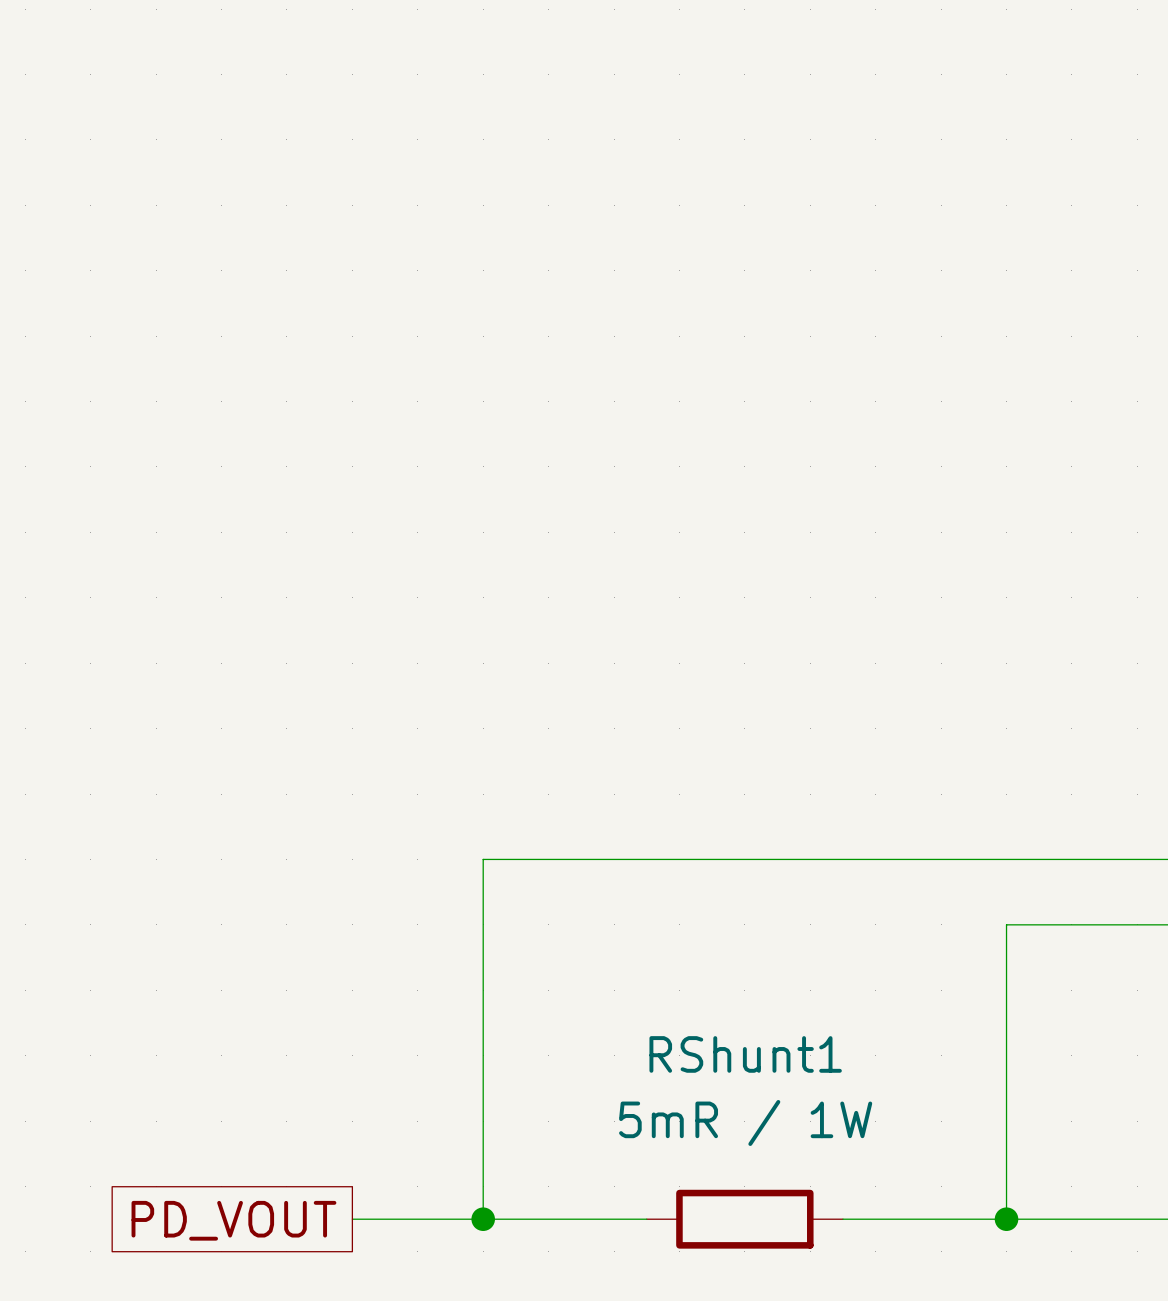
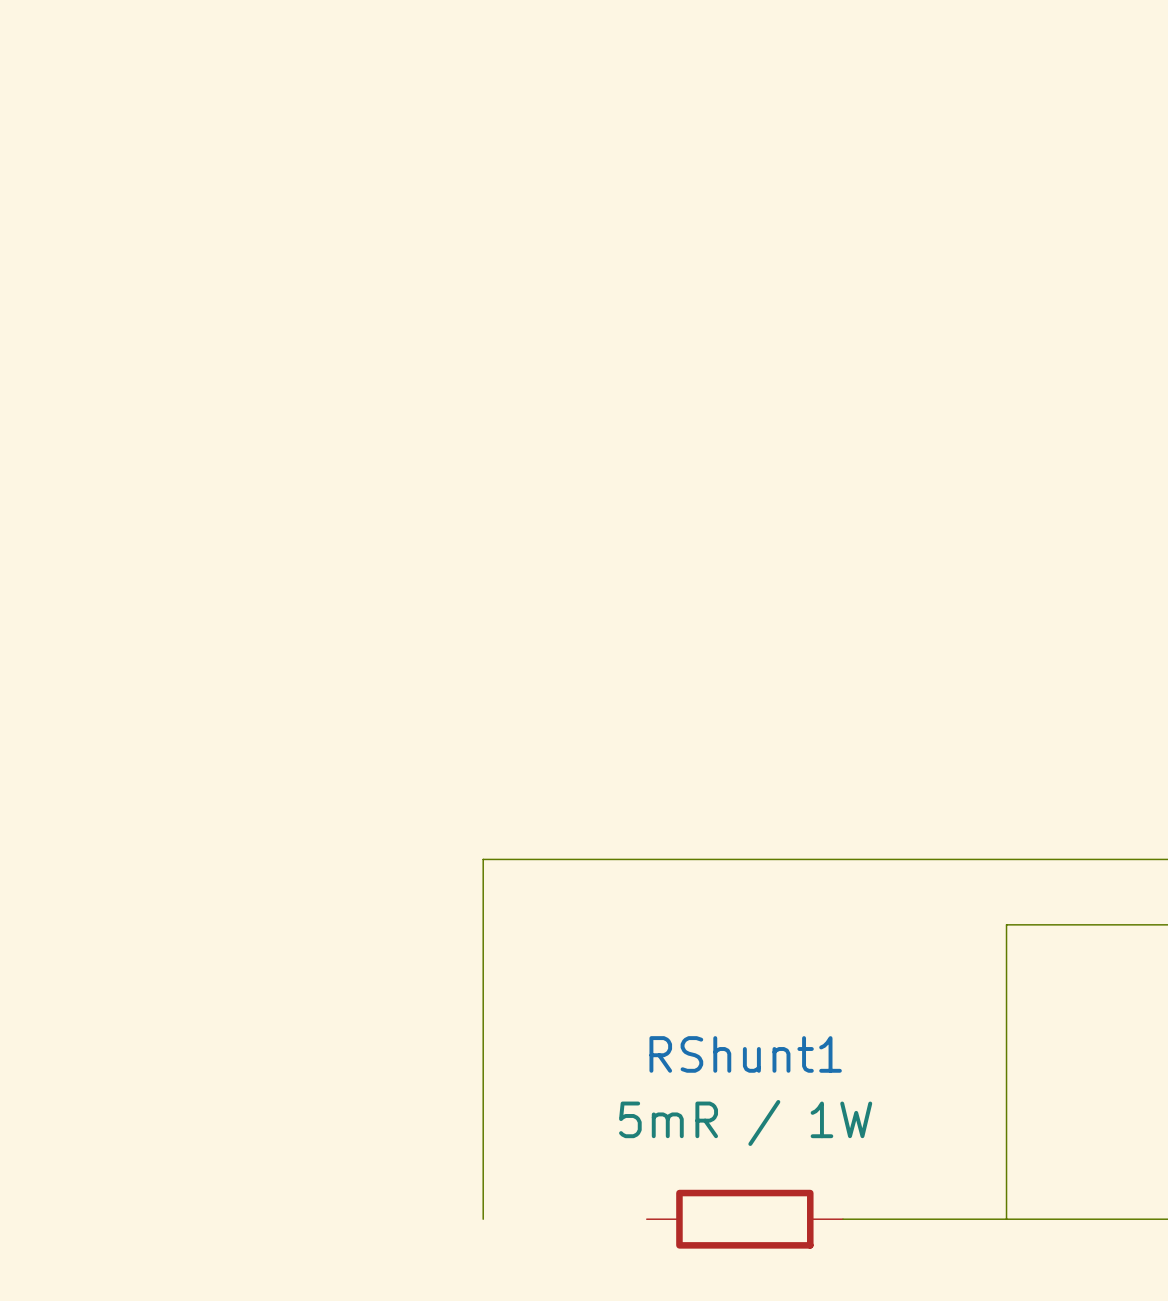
wire: (352, 1219) (646, 1219) -> none
junction: (483, 1219) -> none
junction: (1006, 1219) -> none
global label: PD_VOUT (233, 1220) -> none

